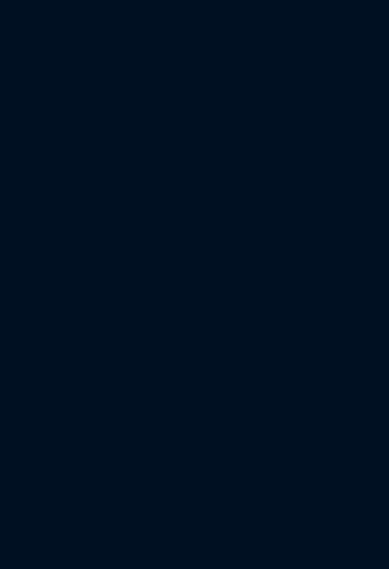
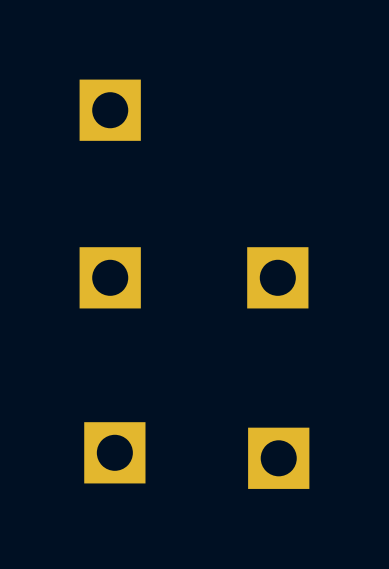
part: none -> (110, 110)
part: none -> (110, 277)
part: none -> (277, 277)
part: none -> (114, 452)
part: none -> (278, 458)

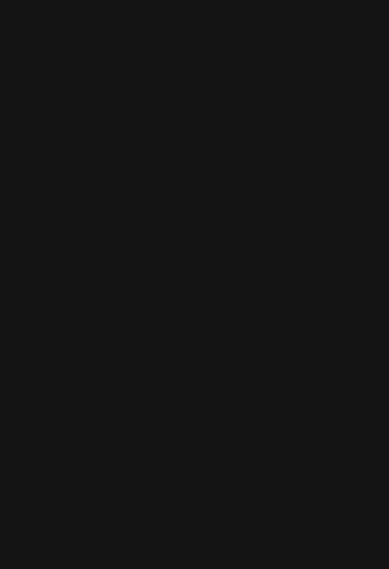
part: (110, 110) -> none
part: (110, 277) -> none
part: (277, 277) -> none
part: (114, 452) -> none
part: (278, 458) -> none

